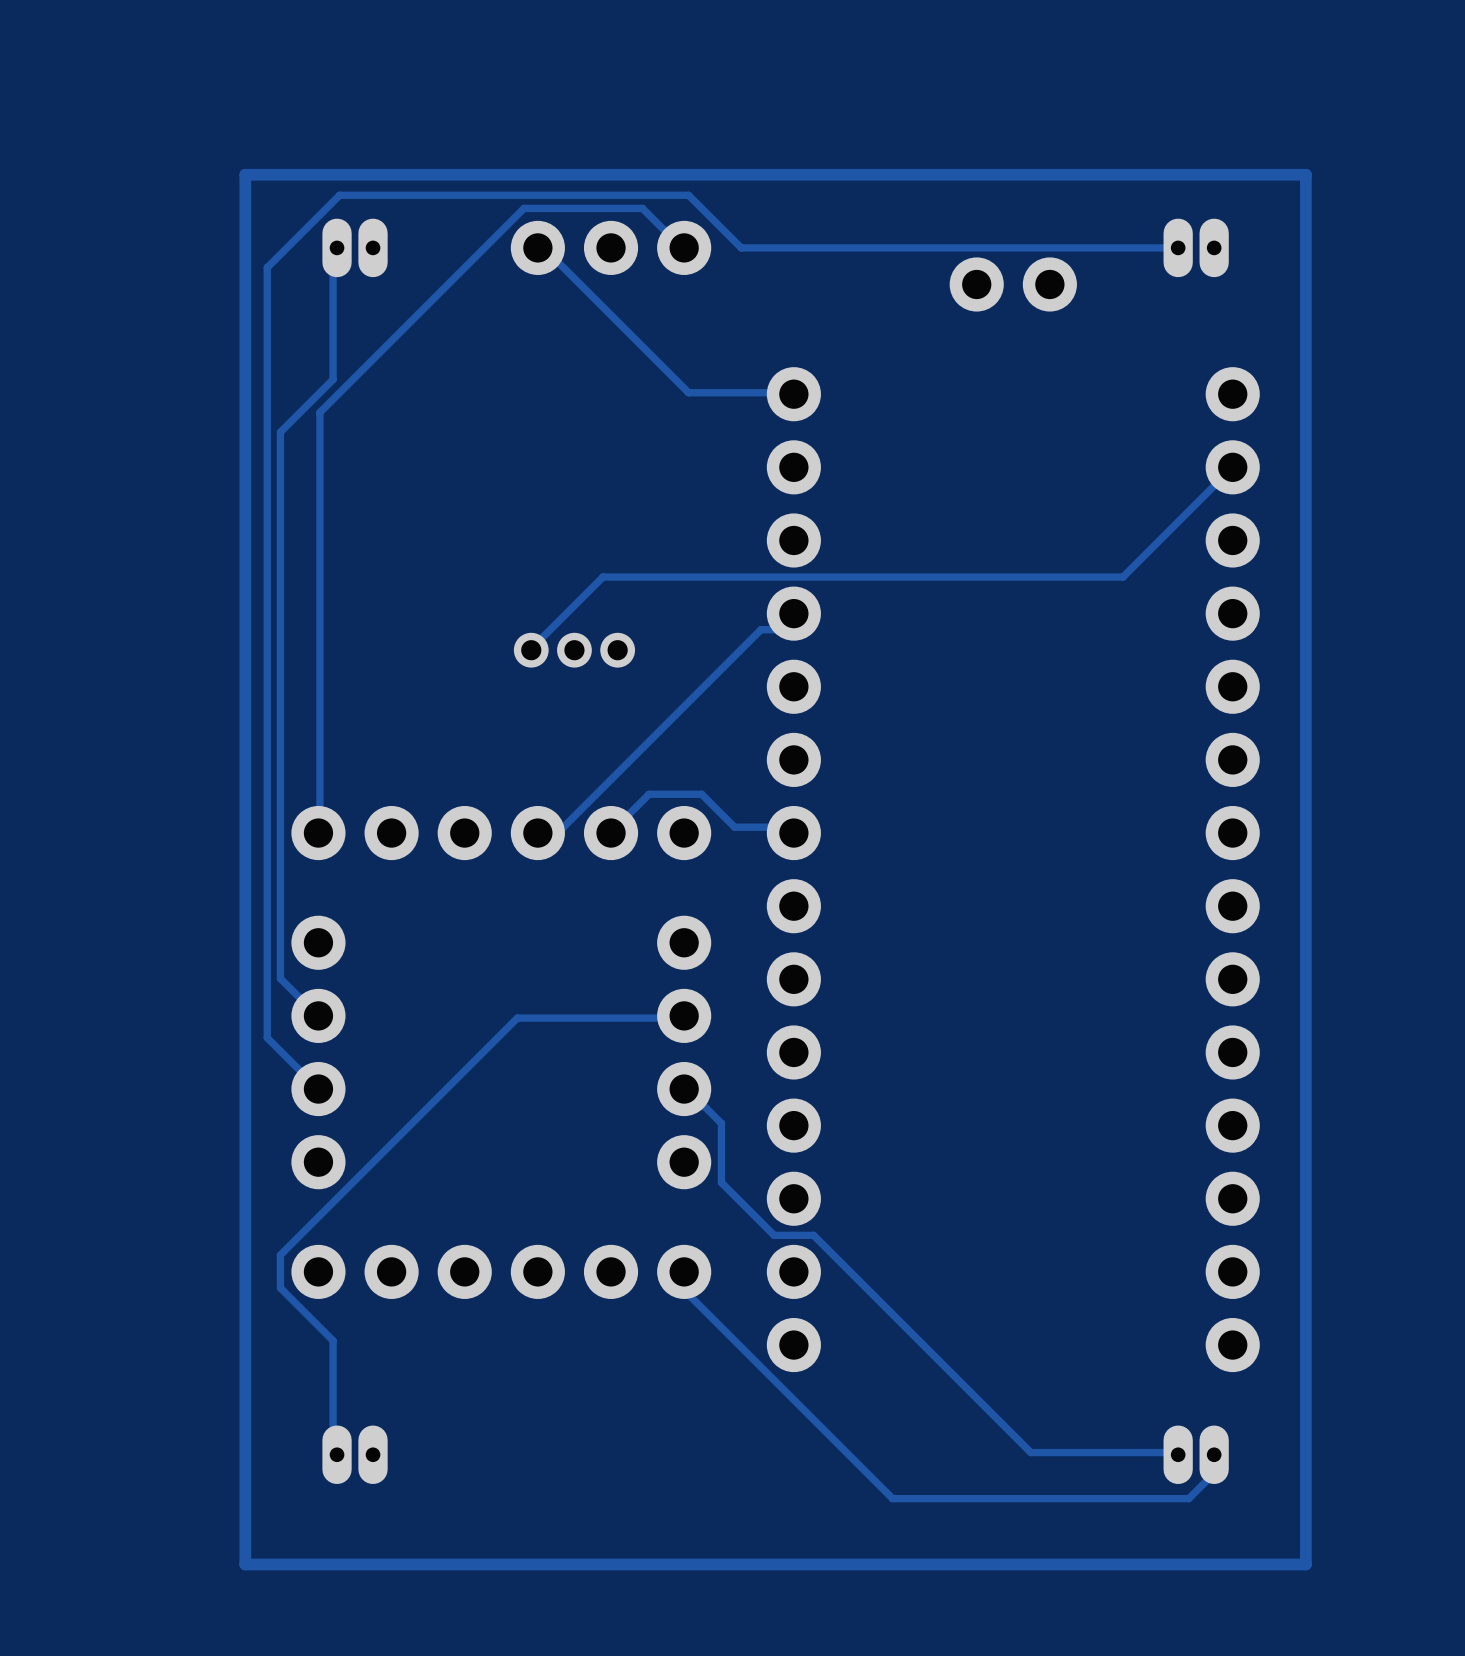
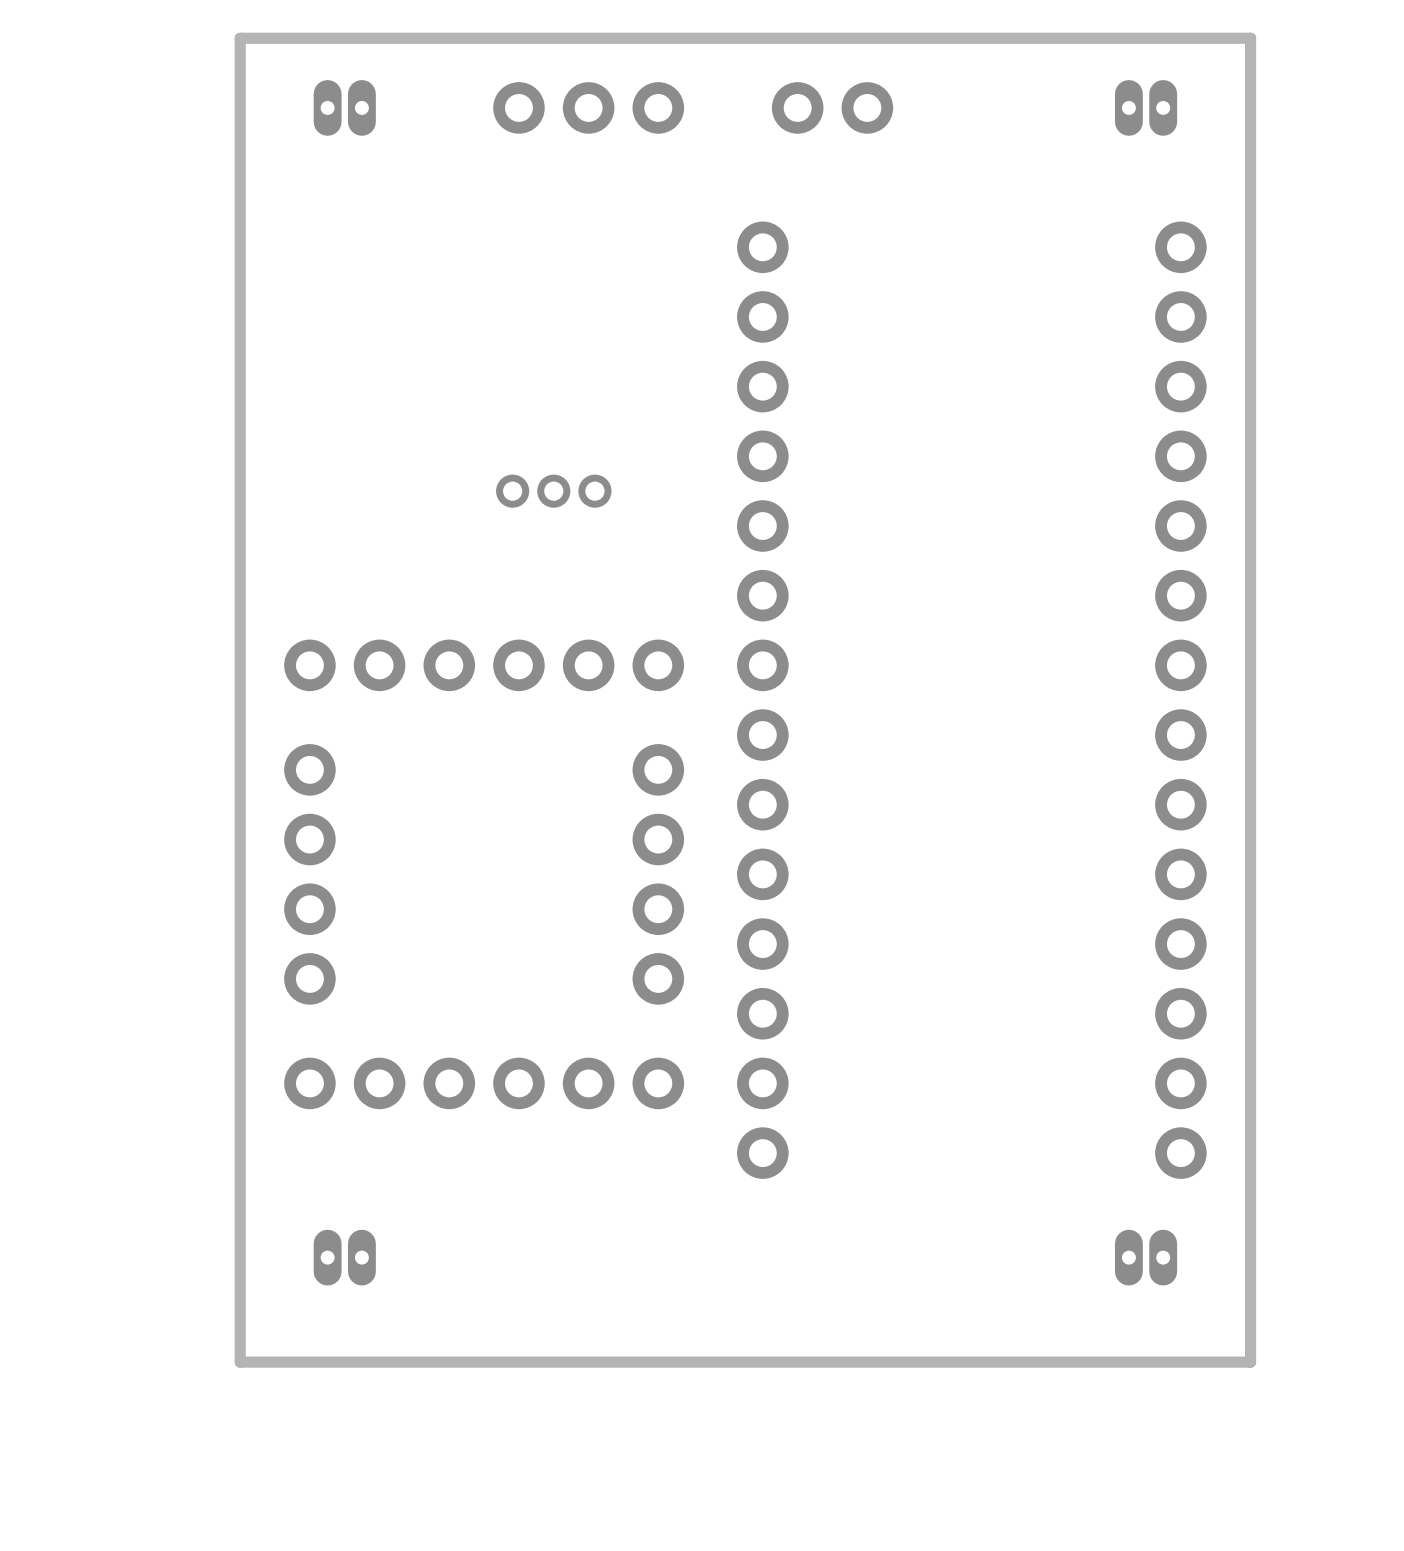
track: (337, 247) (333, 247) (333, 379) (280, 432) (280, 978) (318, 1015) -> none
track: (537, 247) (543, 247) (688, 392) (793, 394) -> none
track: (684, 247) (681, 247) (642, 208) (523, 208) (319, 412) (318, 833) -> none
track: (1178, 247) (741, 247) (688, 195) (339, 195) (267, 267) (267, 1037) (318, 1089) -> none
part position: (1013, 284) -> (832, 107)
track: (1232, 467) (1123, 577) (602, 577) (537, 642) (537, 649) (531, 650) -> none
track: (793, 613) (793, 629) (760, 629) (563, 827) (543, 827) (537, 833) -> none
track: (793, 833) (793, 827) (734, 827) (701, 794) (649, 794) (611, 833) -> none
track: (684, 1015) (681, 1018) (517, 1018) (280, 1255) (280, 1288) (333, 1340) (333, 1452) (337, 1454) -> none
track: (684, 1089) (688, 1090) (721, 1123) (721, 1182) (774, 1235) (813, 1235) (1030, 1452) (1175, 1452) (1178, 1454) -> none
track: (684, 1271) (688, 1274) (688, 1294) (892, 1498) (1188, 1498) (1208, 1478) (1208, 1459) (1214, 1454) -> none

